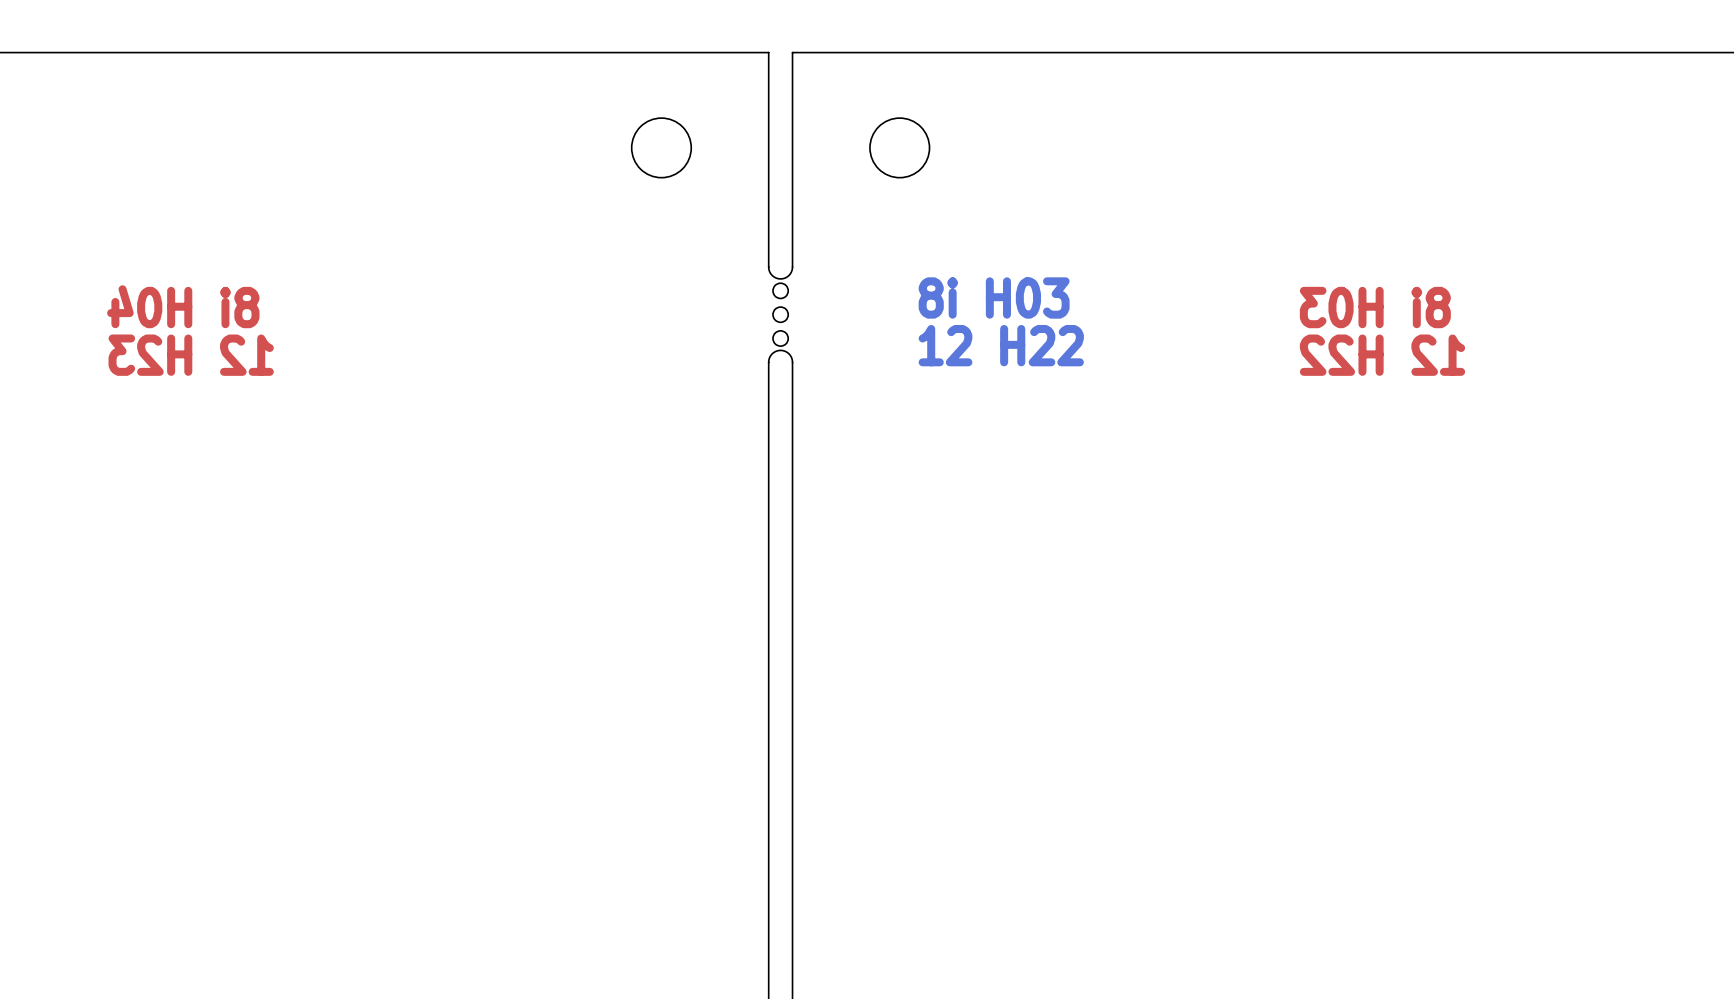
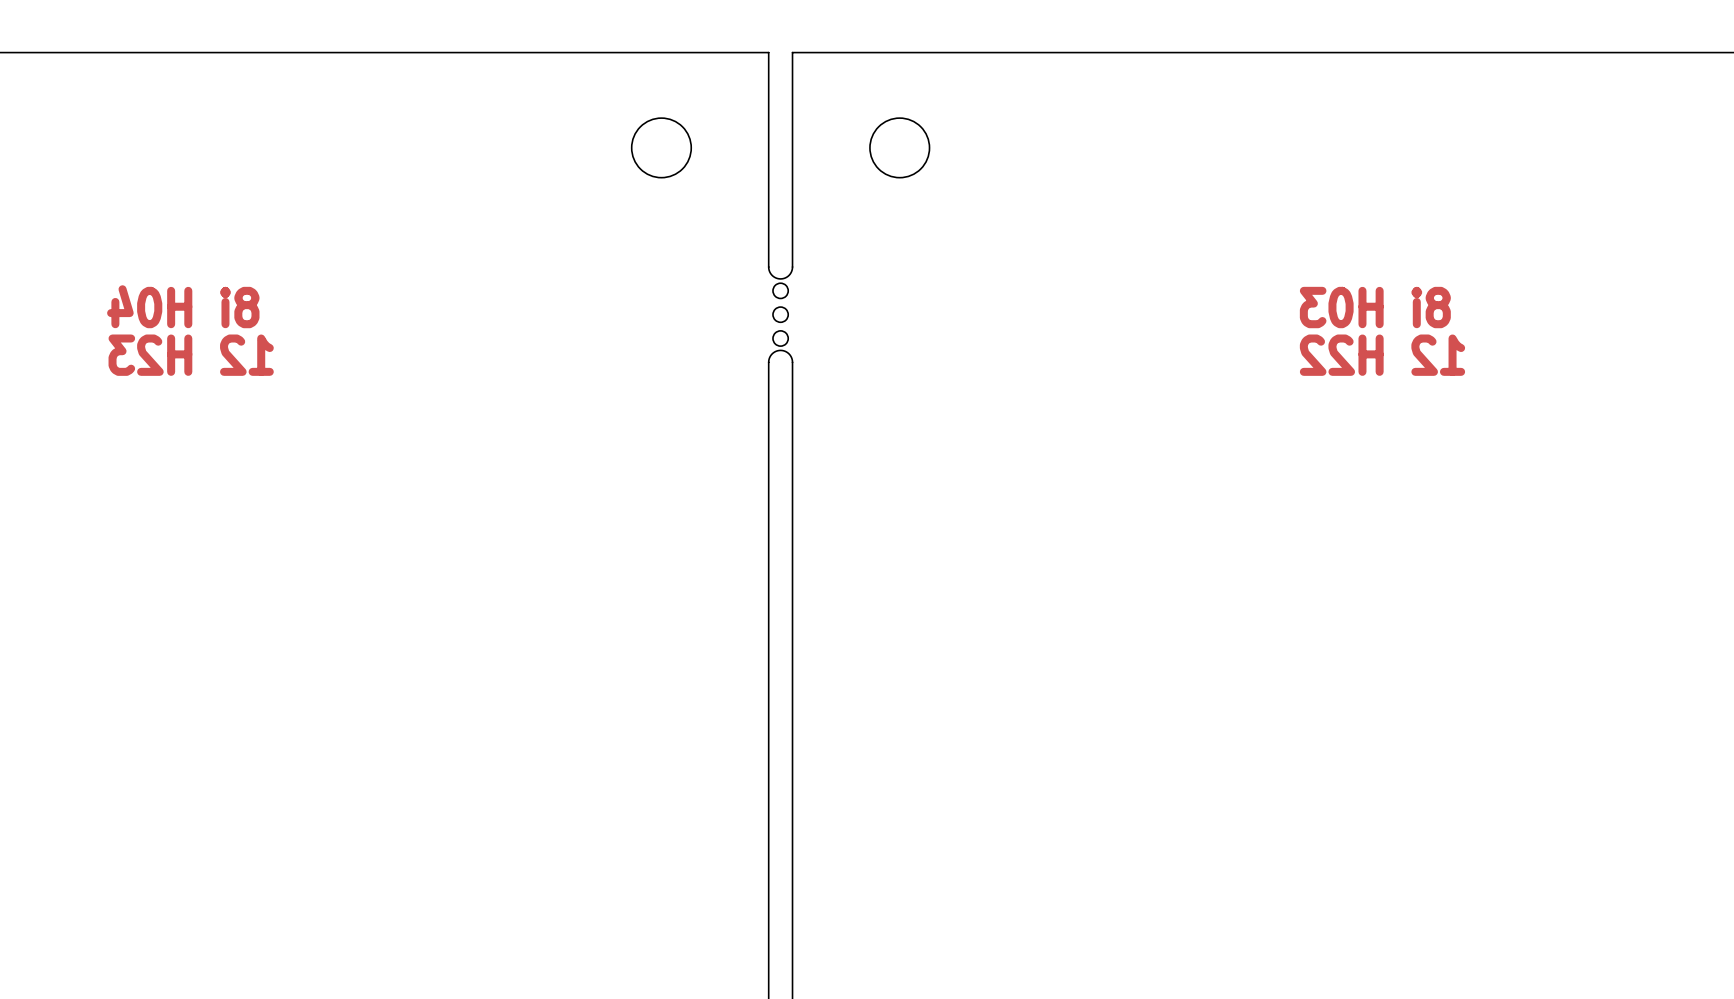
text: 8i H03 (994, 297) -> none
text: 12 H22 (1001, 345) -> none

